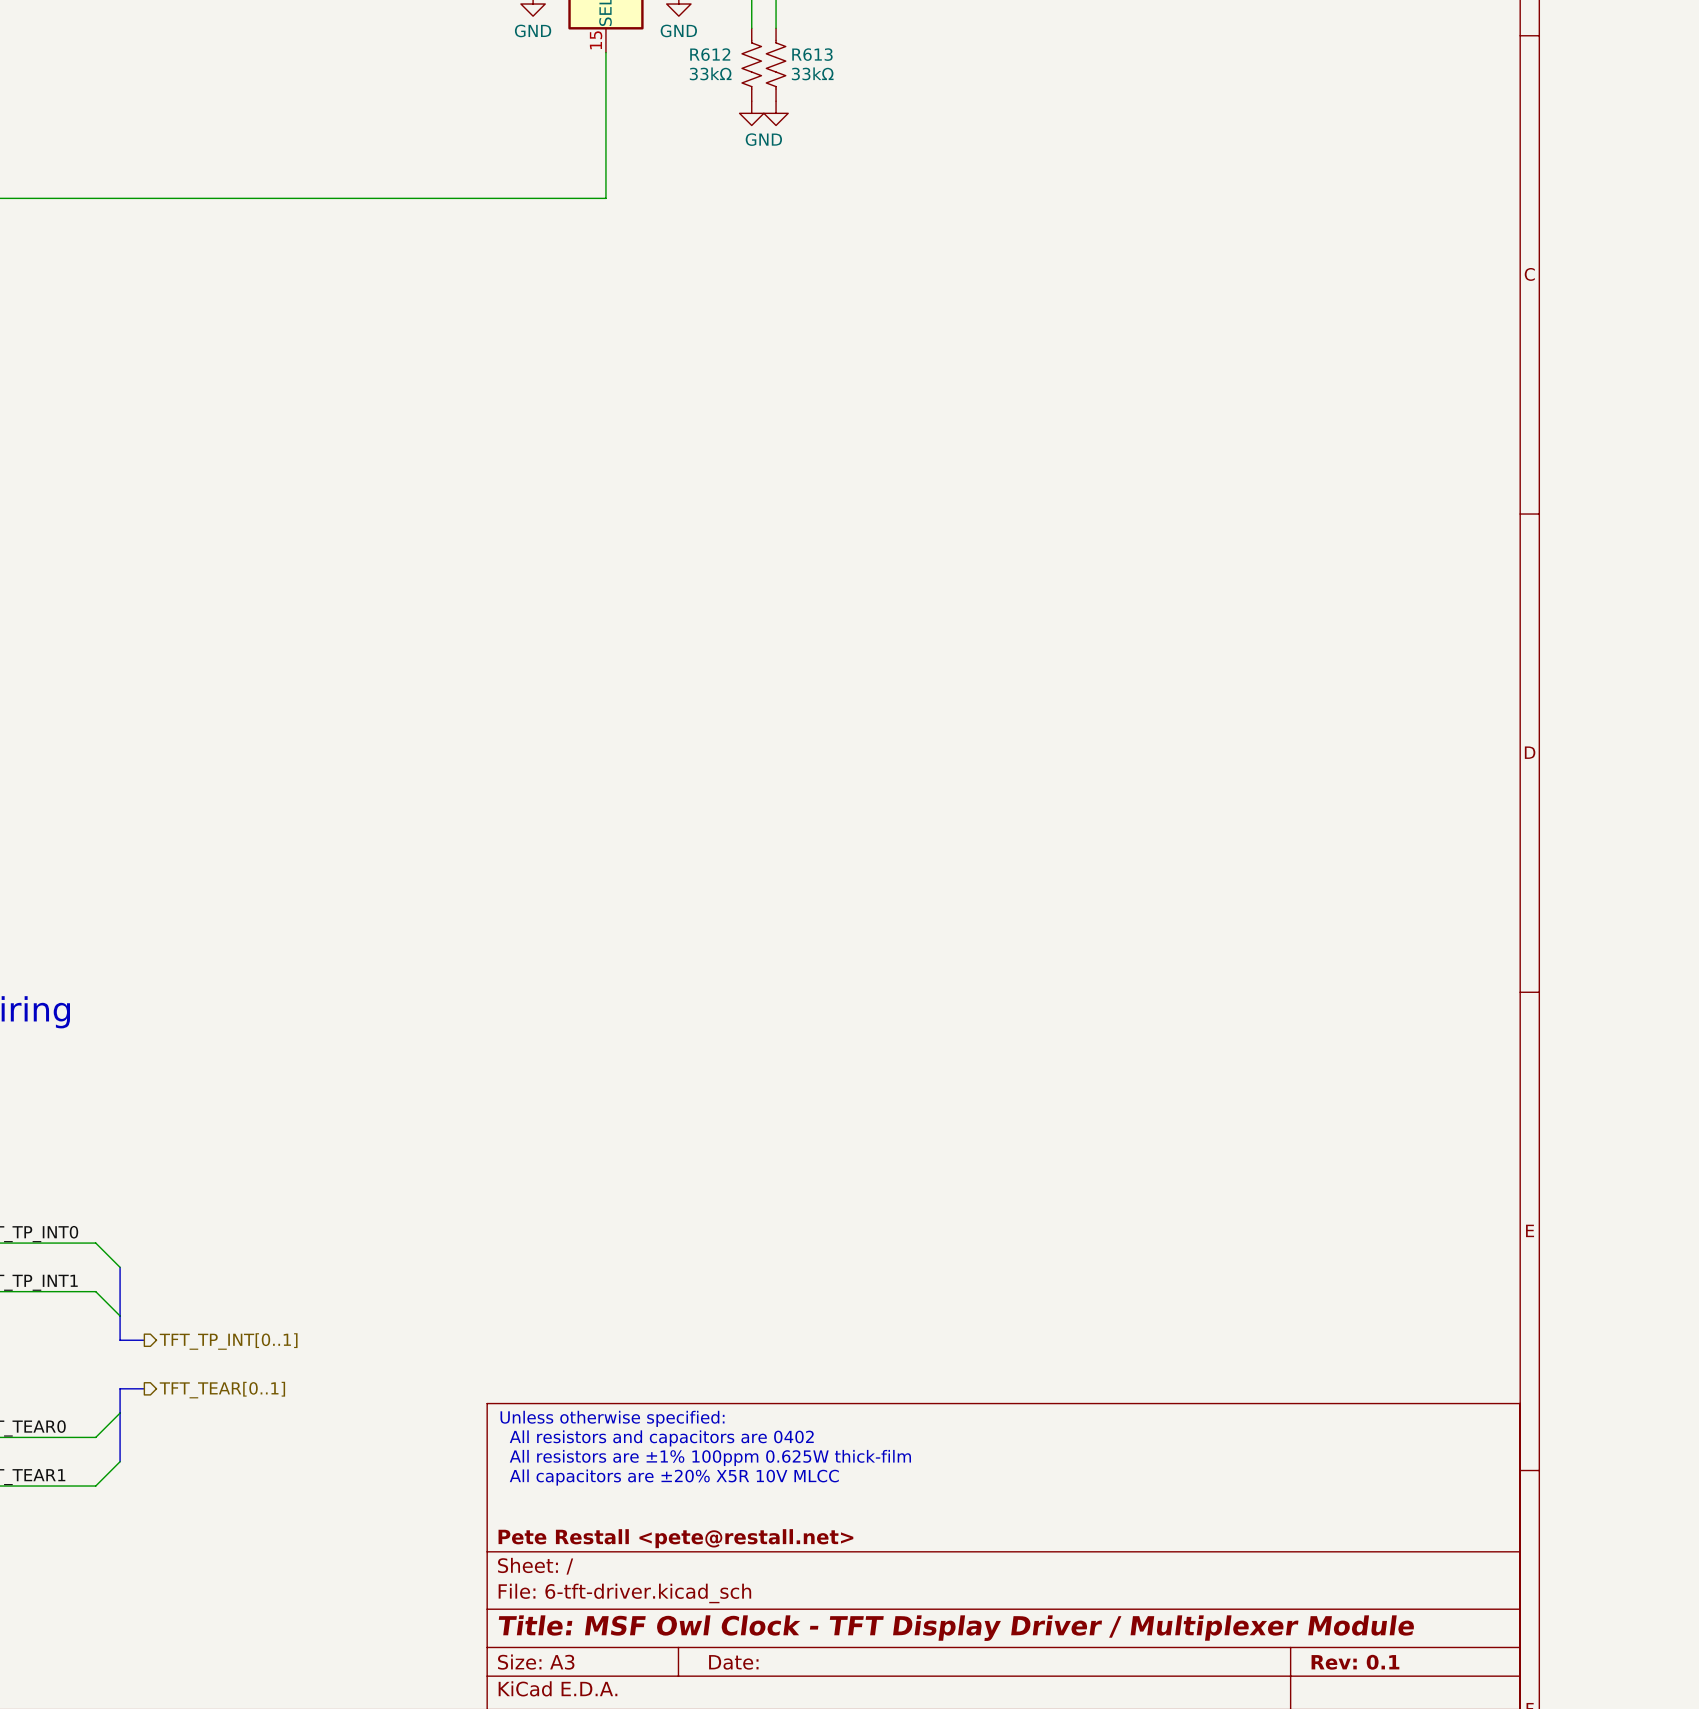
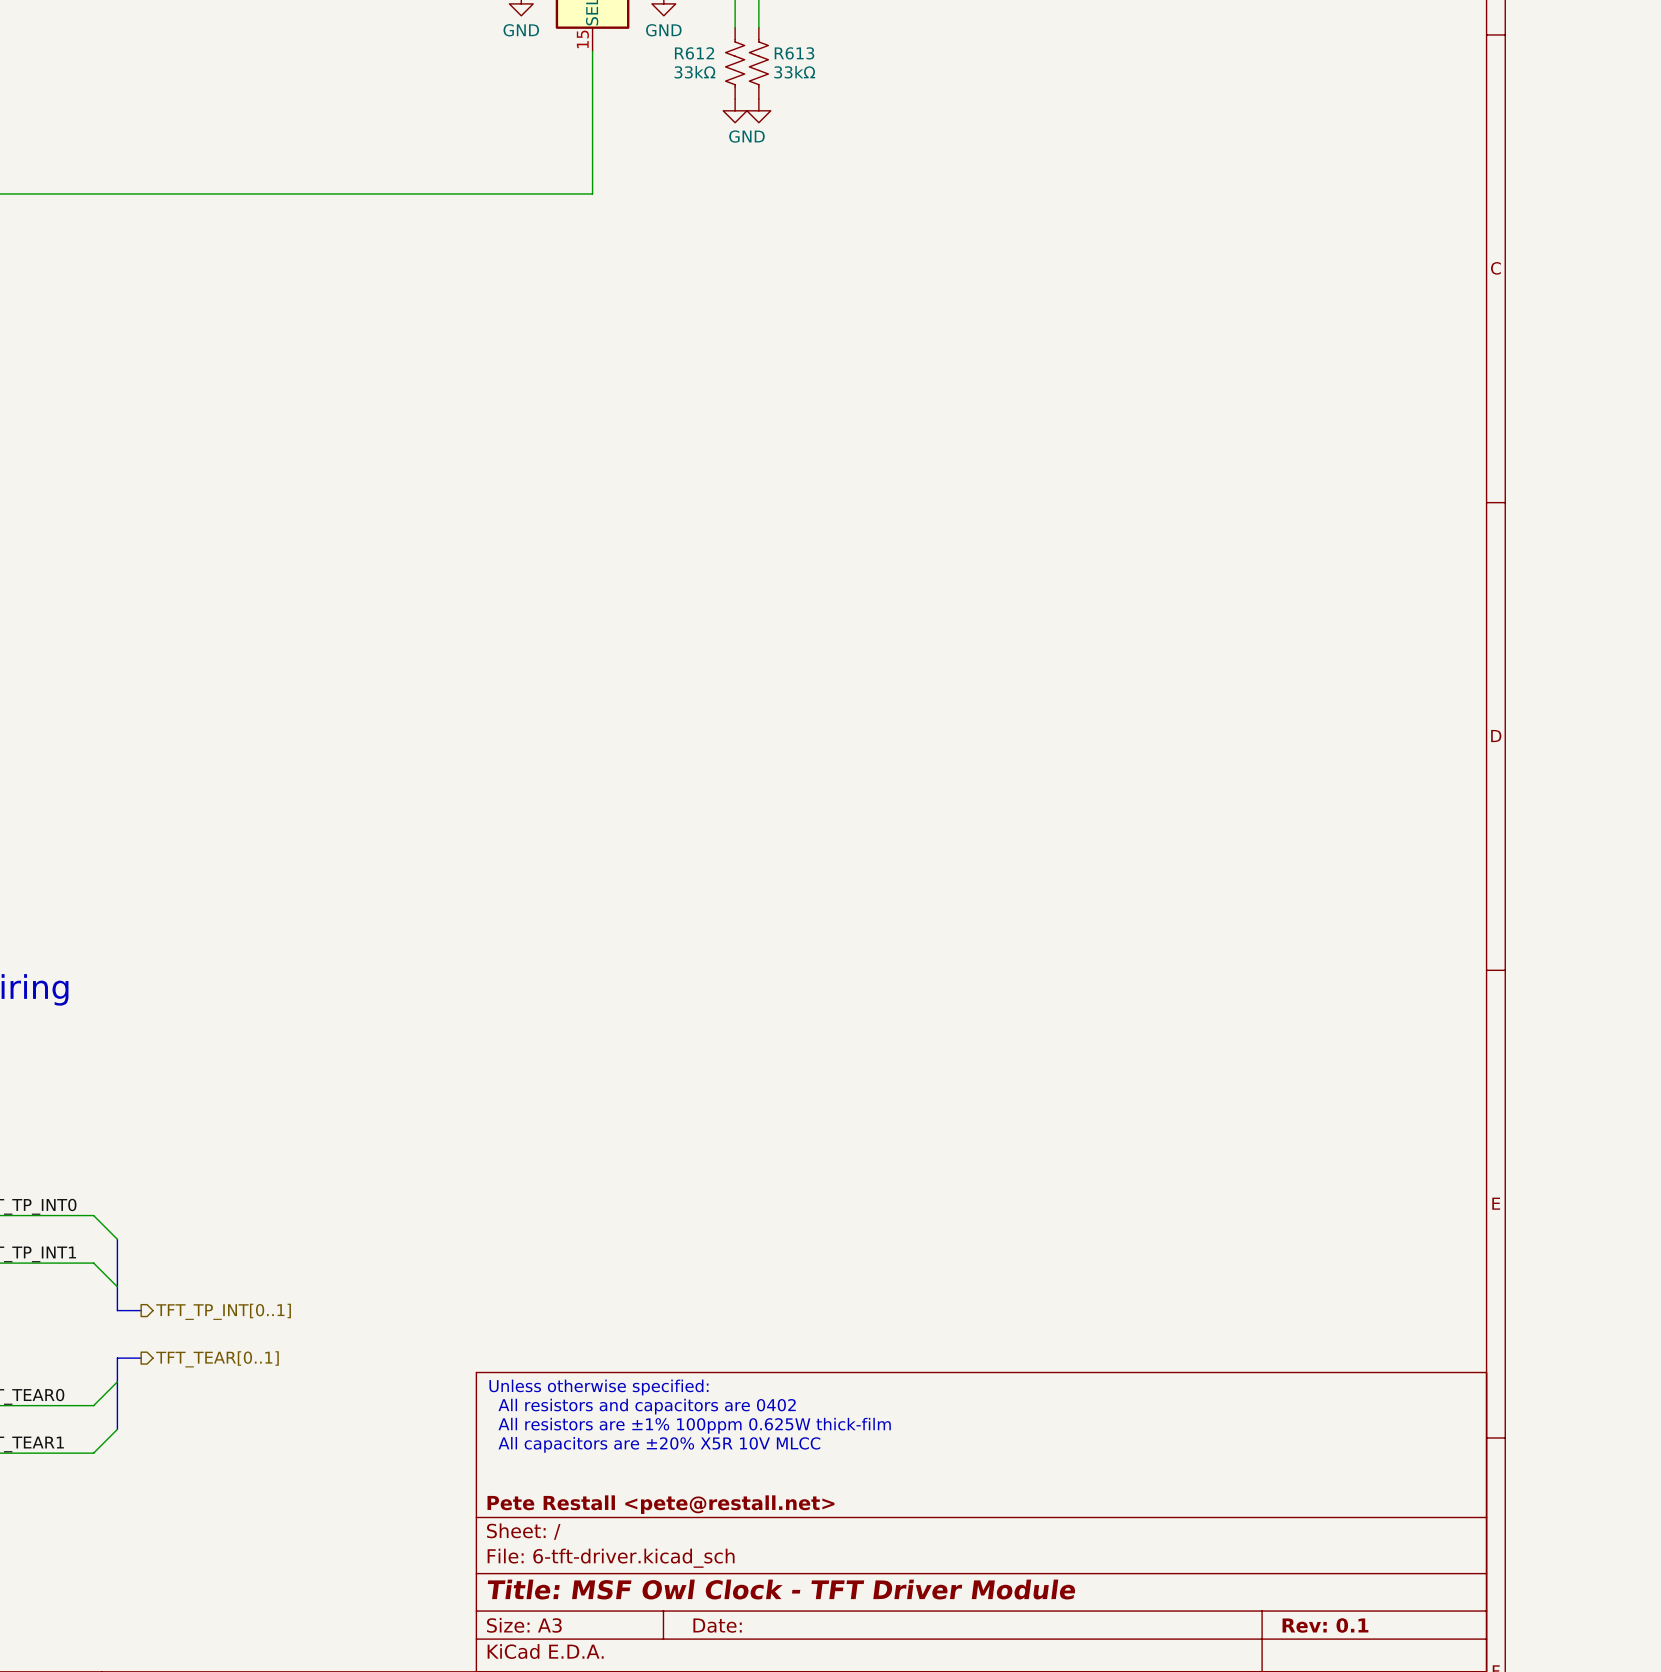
title block: Title: MSF Owl Clock - TFT Display Driver / Multiplexer Module (956, 1628) -> Title: MSF Owl Clock - TFT Driver Module (781, 1589)

